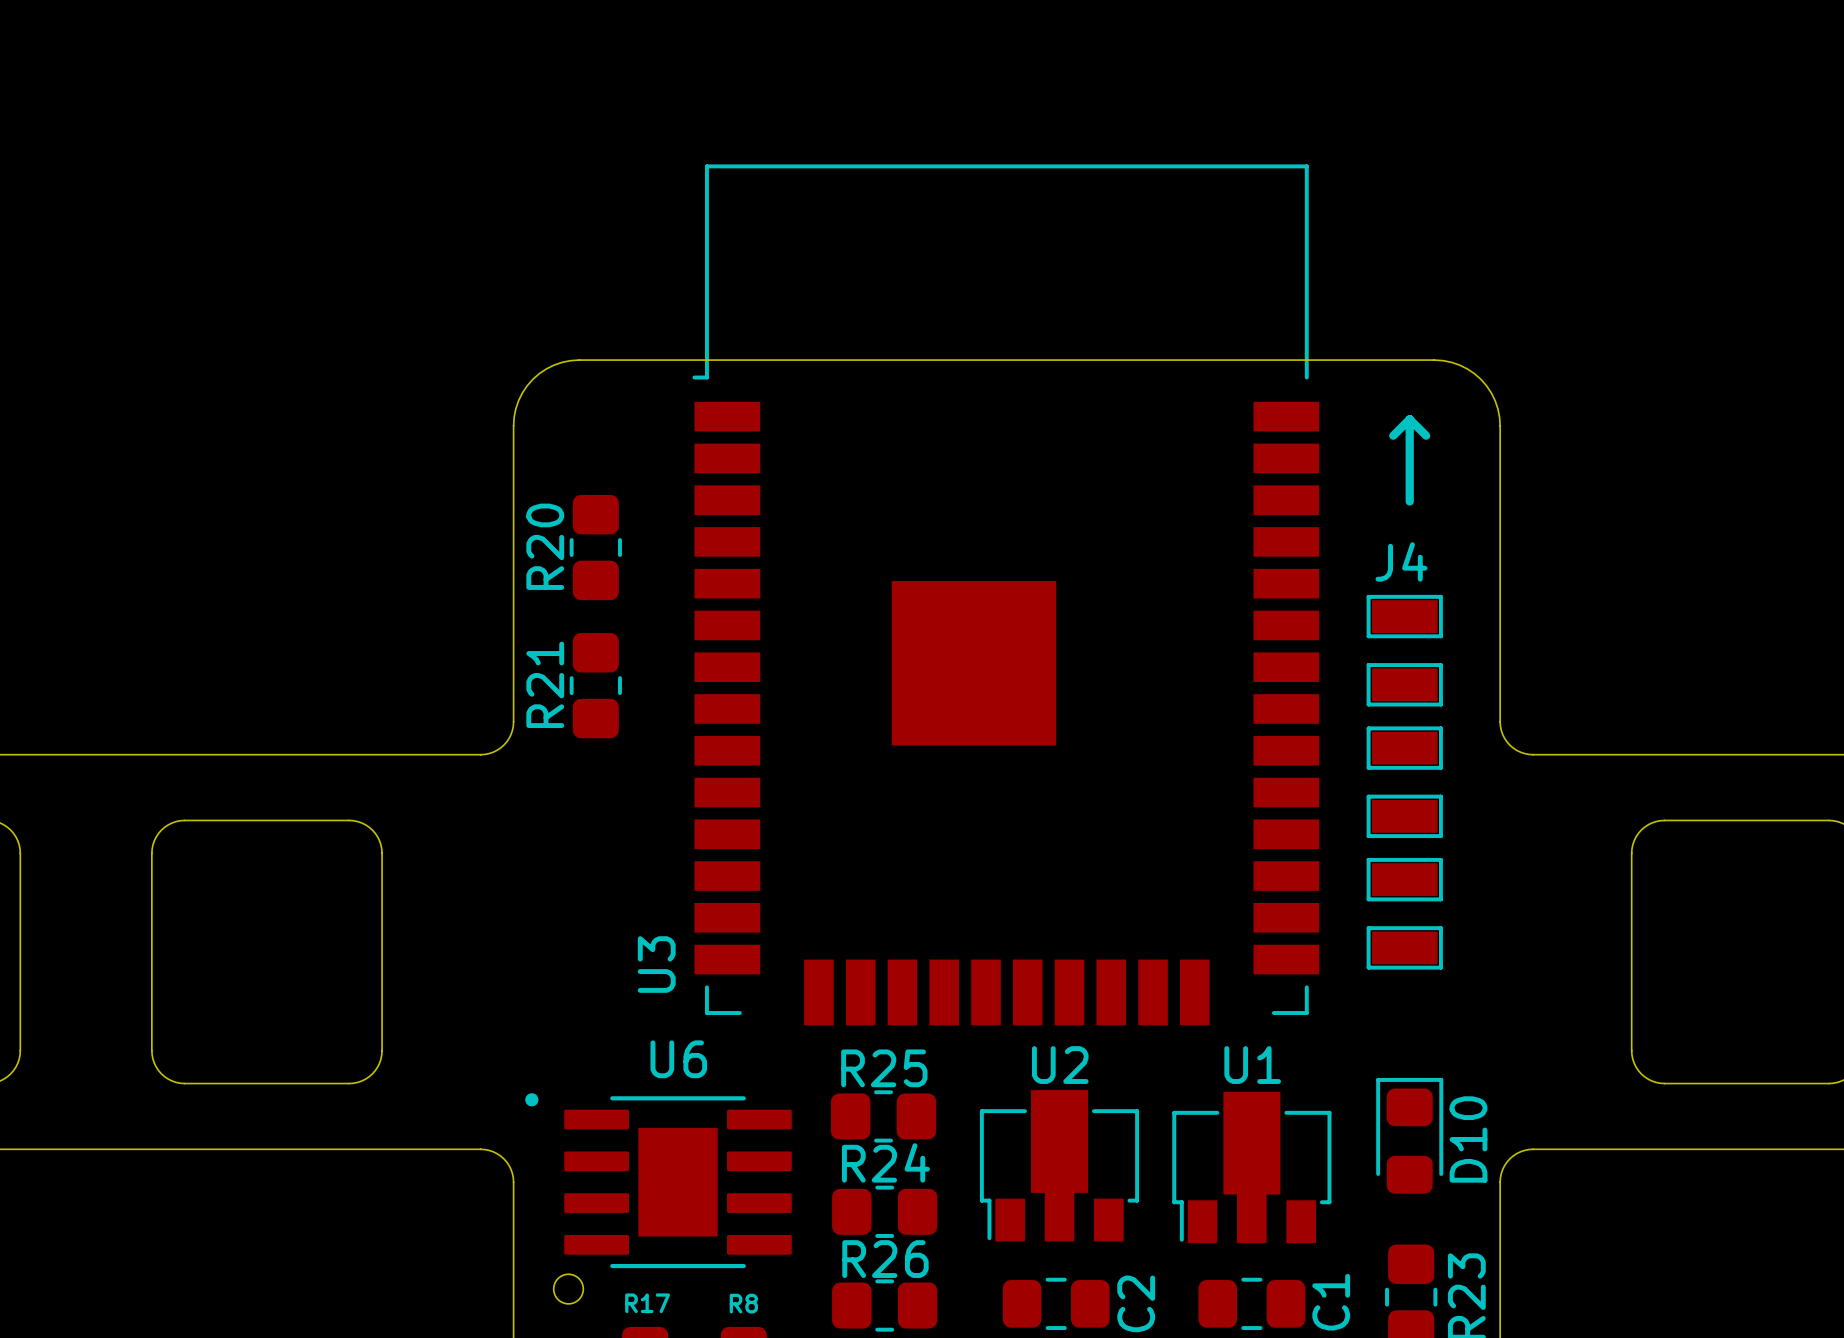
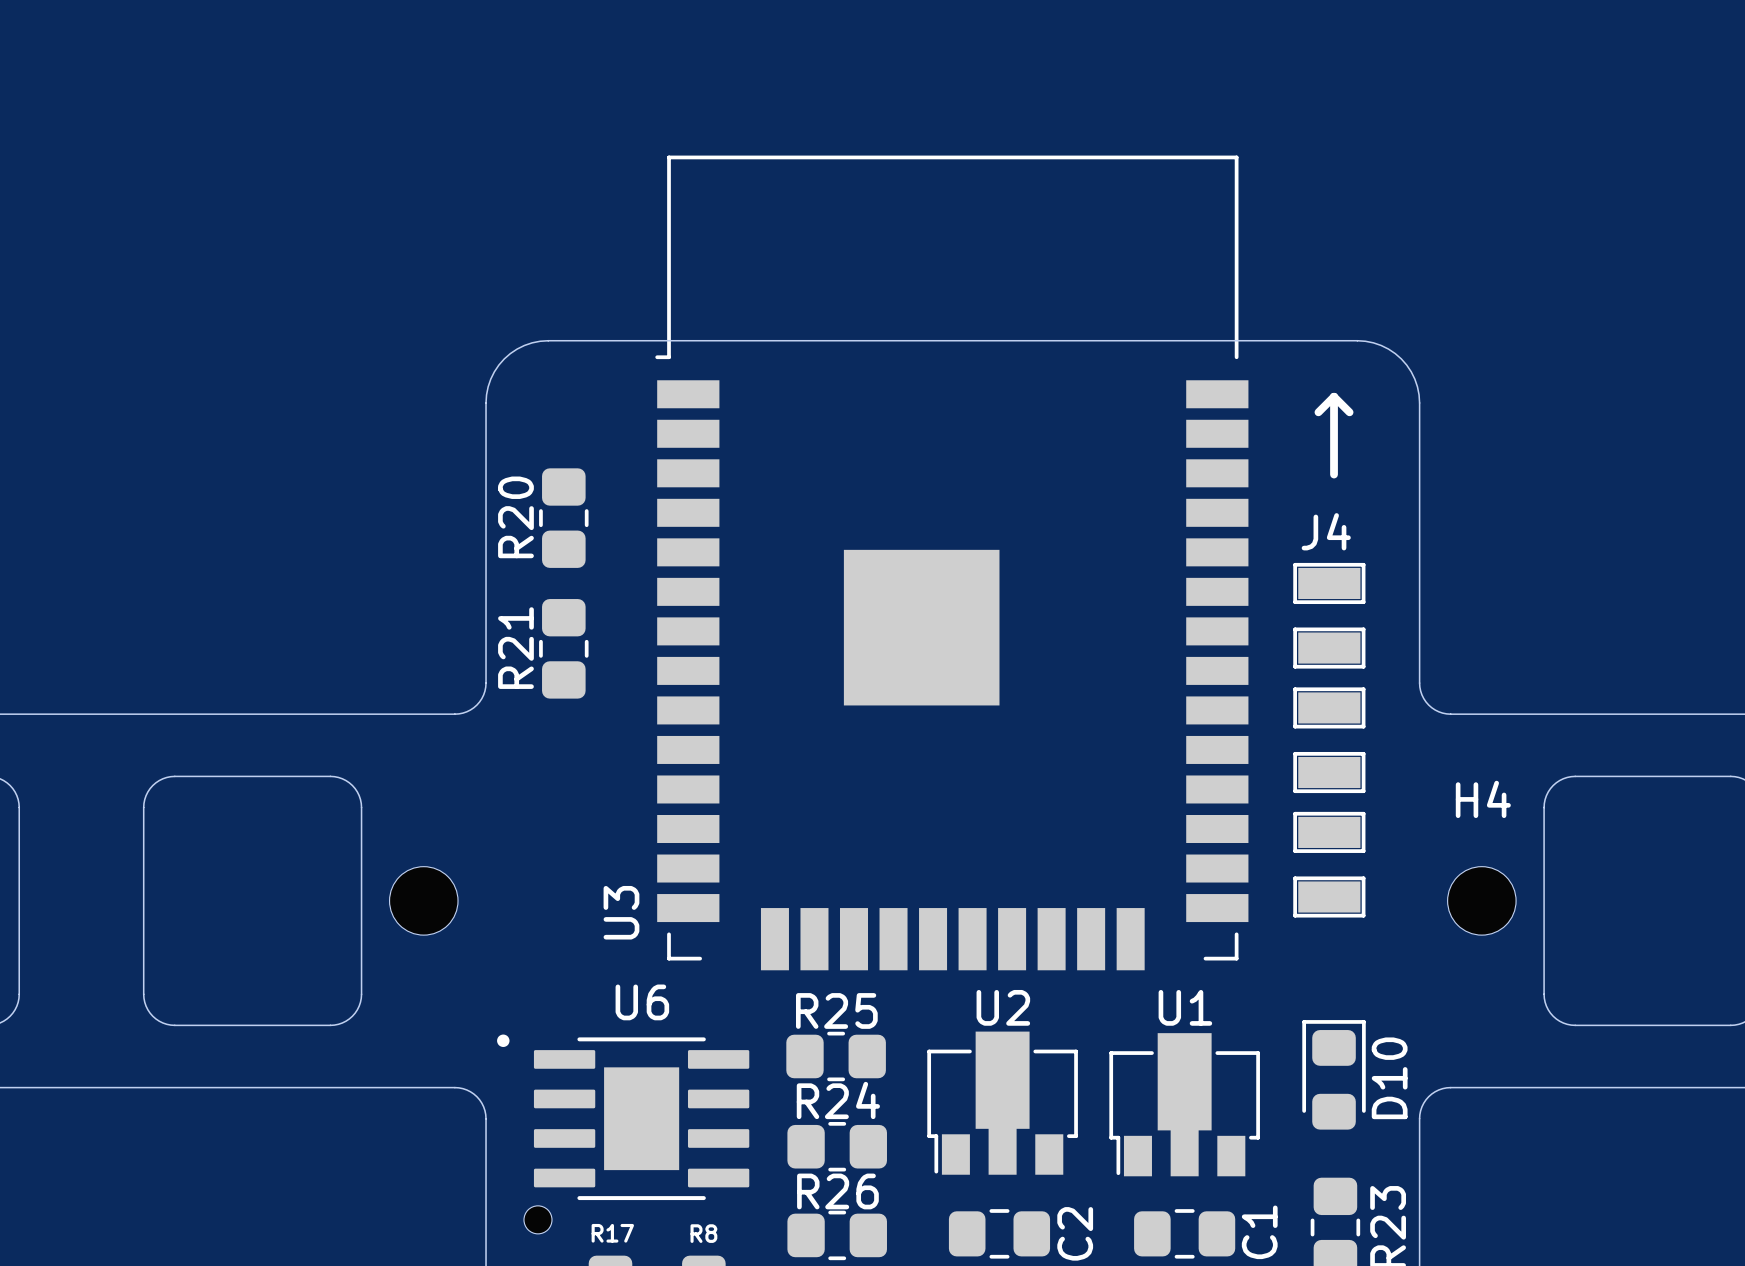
part: none -> (423, 900)
H4: none -> (1481, 900)

